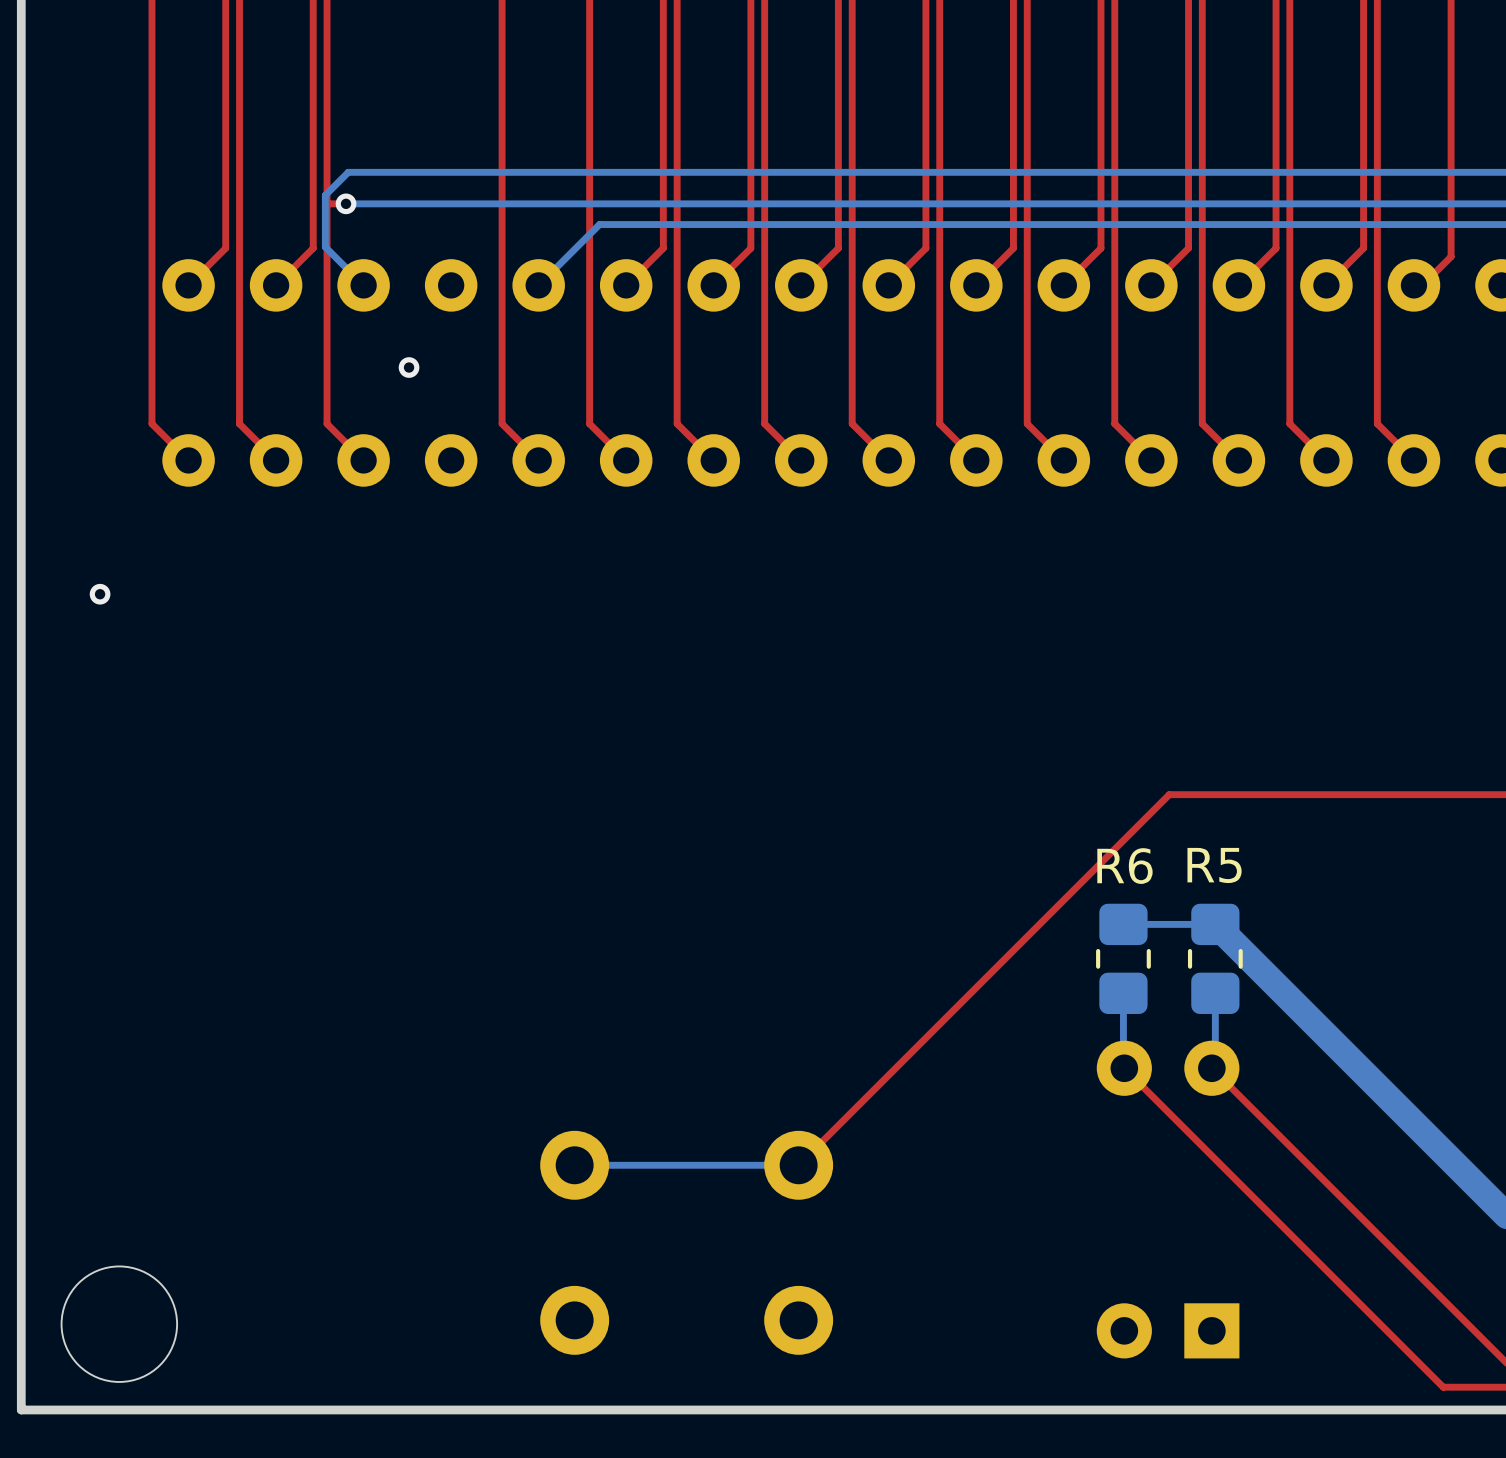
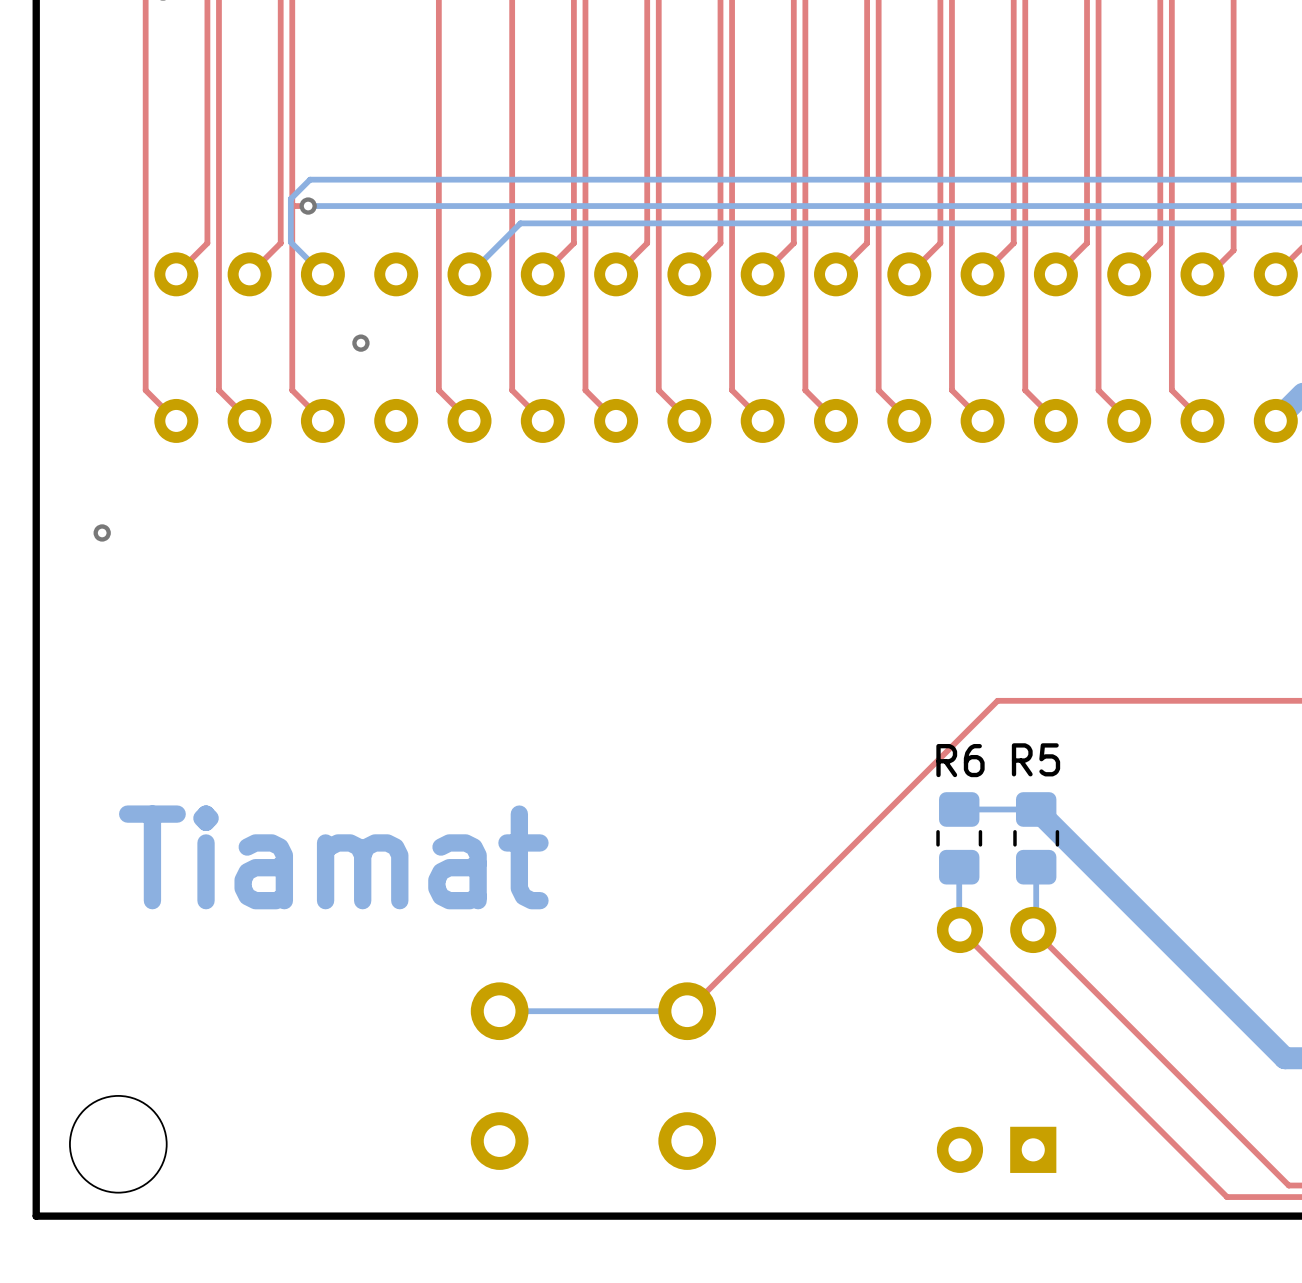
text: none -> Tiamat (333, 857)

